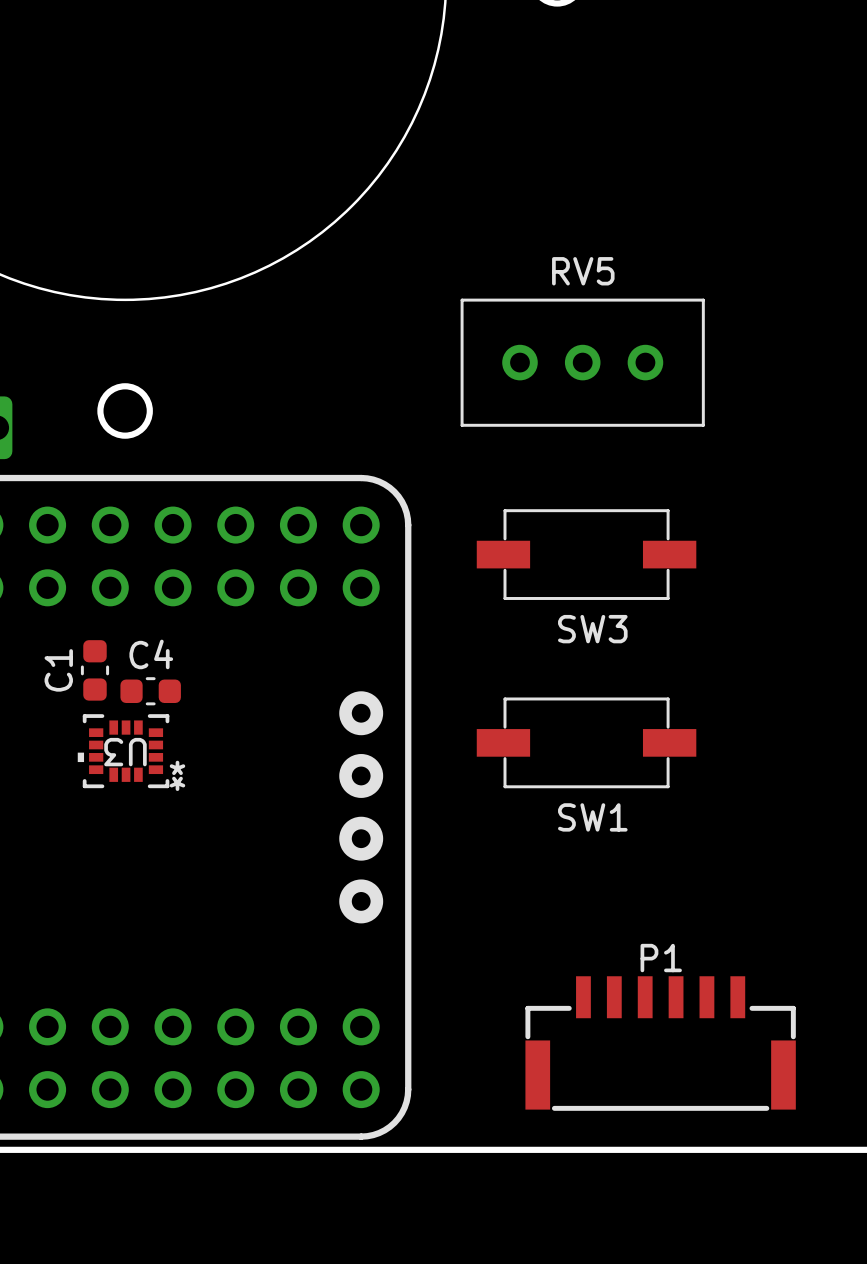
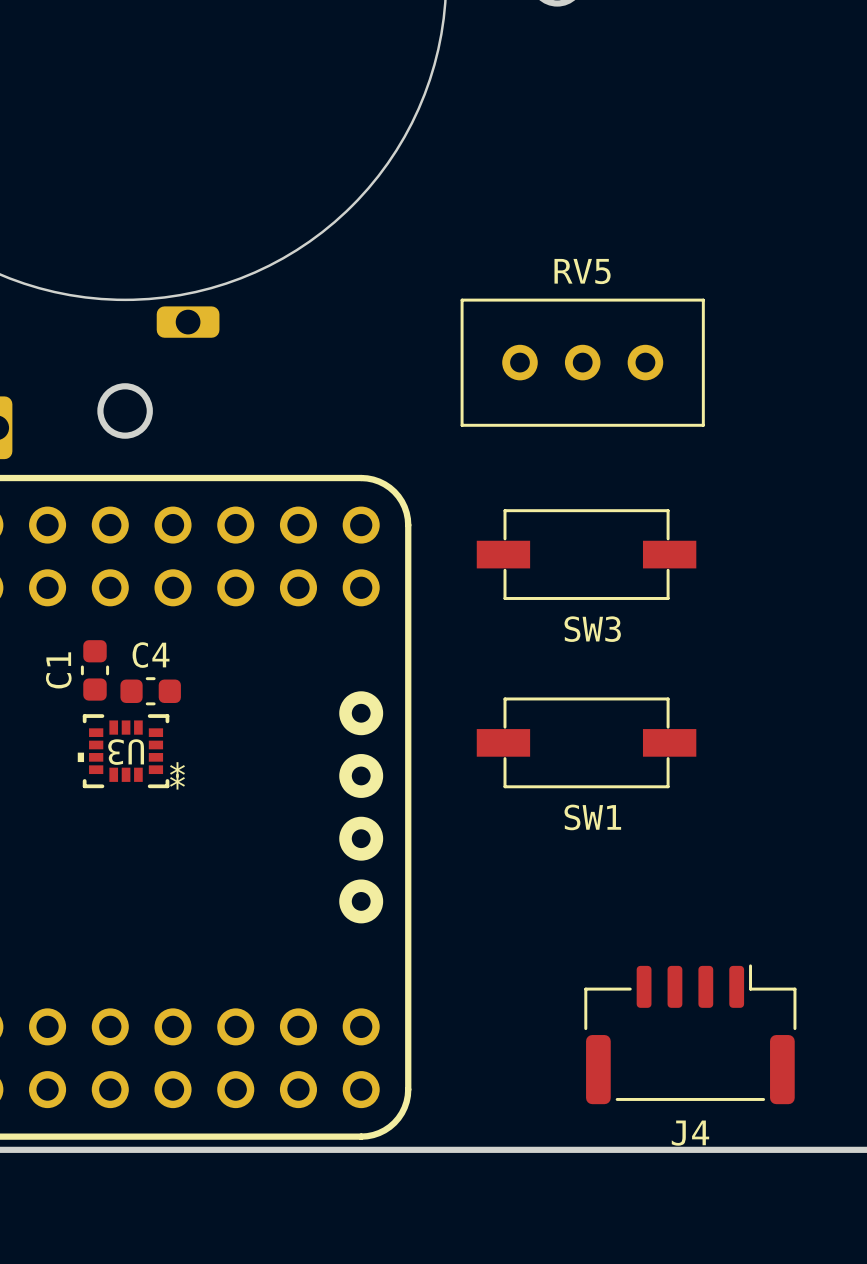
part: none -> (188, 322)
J4: none -> (690, 1034)
P1: (660, 1043) -> none

